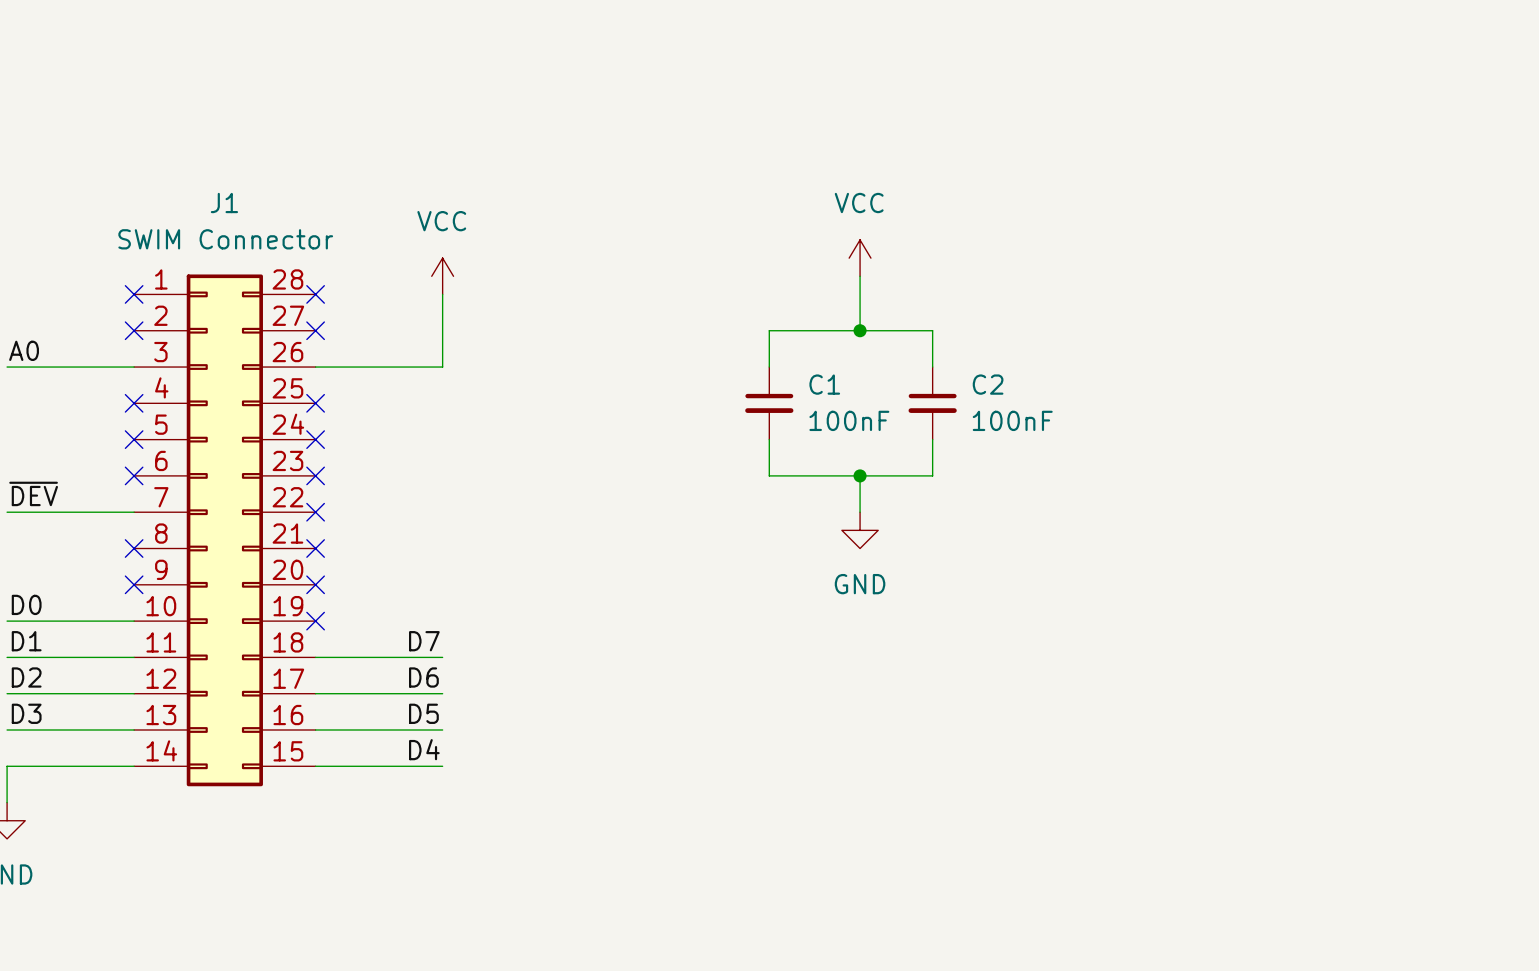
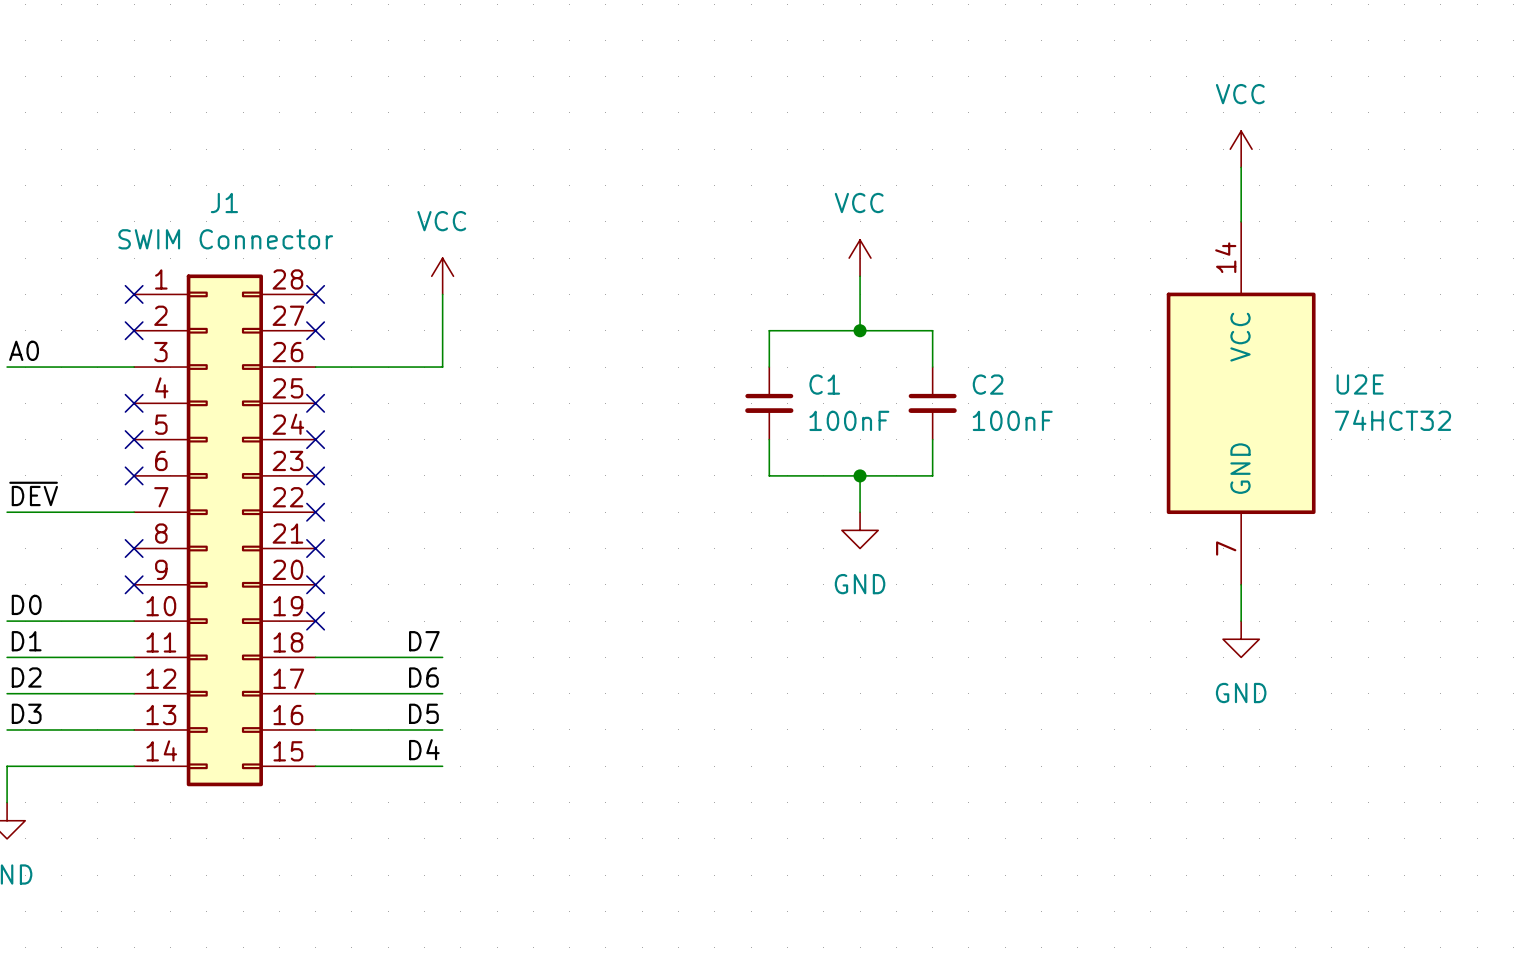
power symbol: none -> VCC (1241, 149)
wire: none -> (1241, 167) (1241, 221)
U2E: none -> 74HCT32 (1241, 403)
wire: none -> (1241, 584) (1241, 621)
power symbol: none -> GND (1241, 639)

